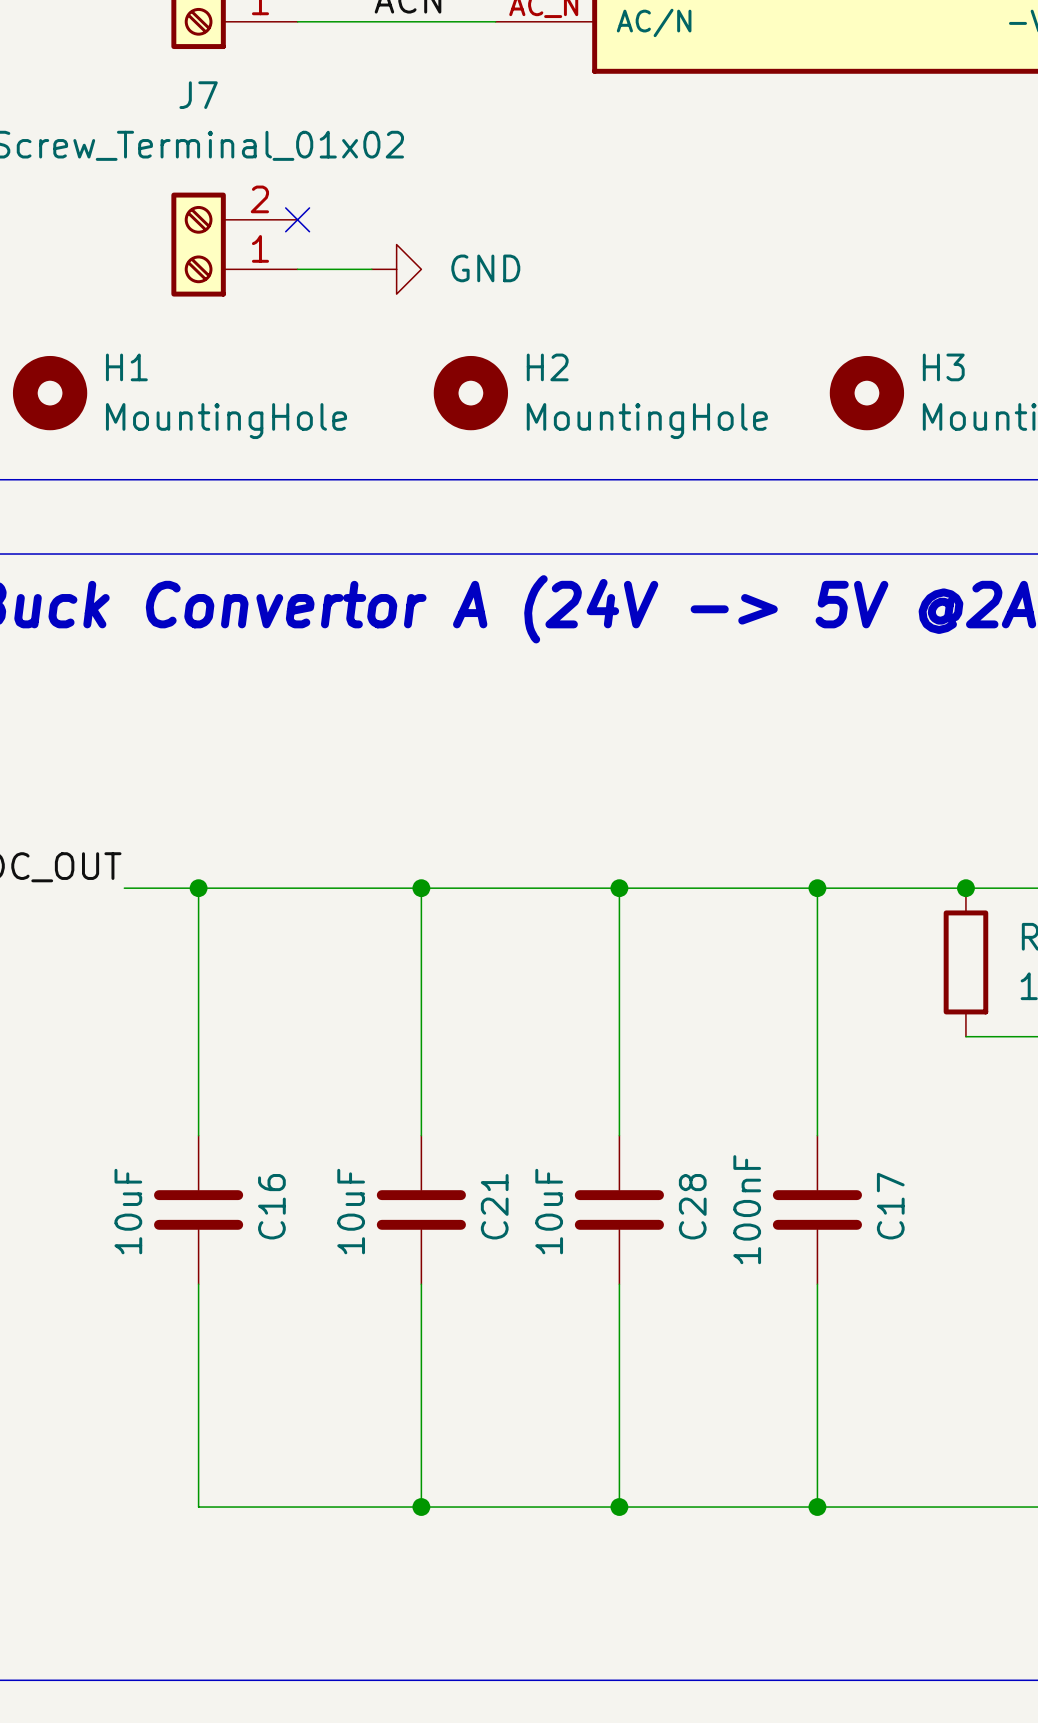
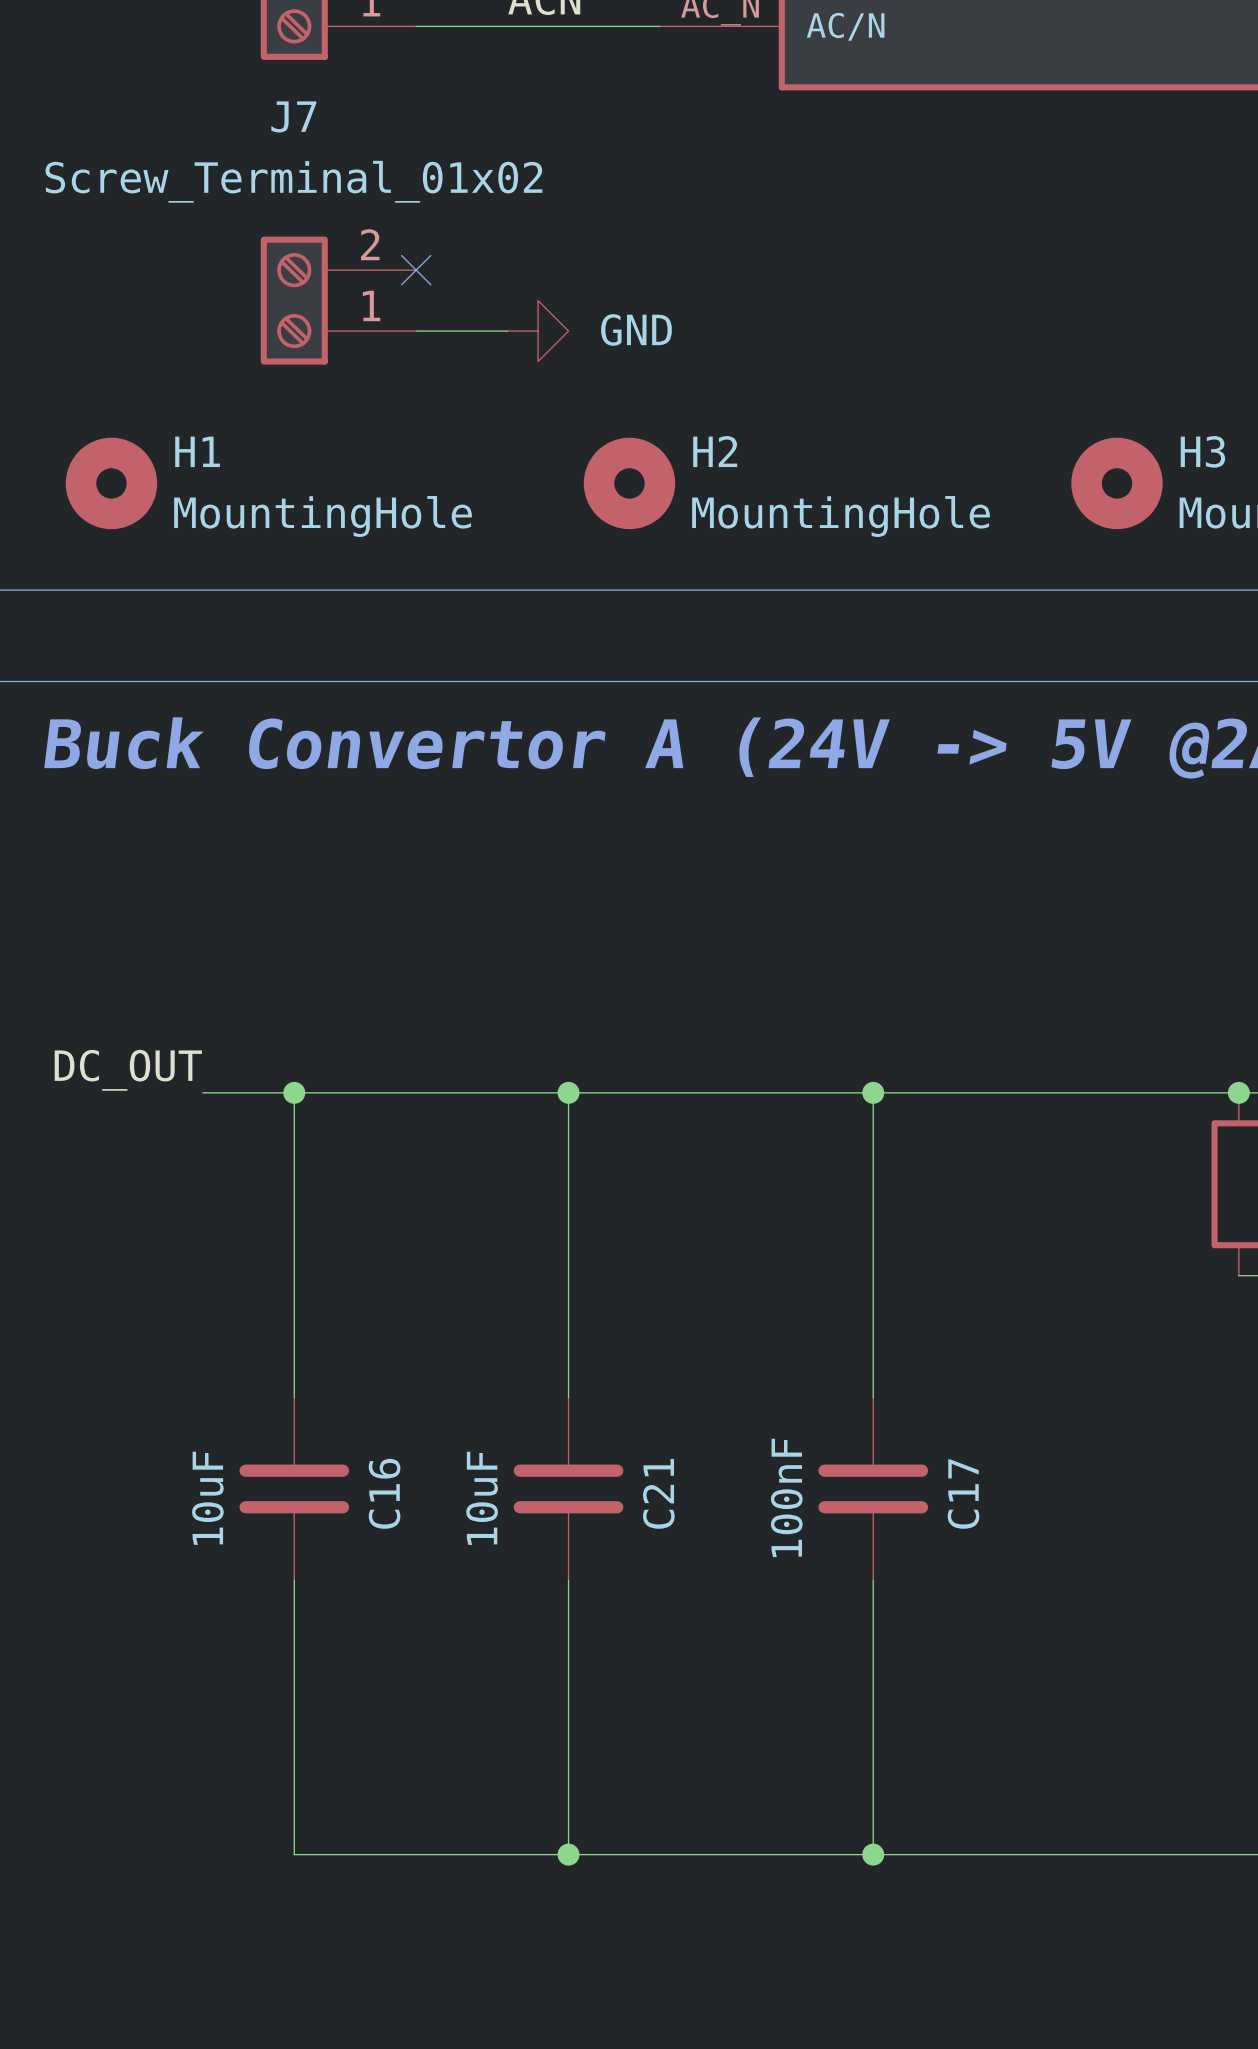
wire: (619, 888) (619, 1135) -> (873, 1092) (873, 1397)
junction position: (619, 888) -> (873, 1092)
wire: (817, 888) (817, 1135) -> none
junction: (817, 888) -> none
C28: 10uF (619, 1209) -> none
C17 position: (817, 1209) -> (873, 1488)
wire: (619, 1284) (619, 1507) -> (873, 1580) (873, 1854)
wire: (817, 1284) (817, 1507) -> none
junction position: (619, 1507) -> (873, 1854)
junction: (817, 1507) -> none

